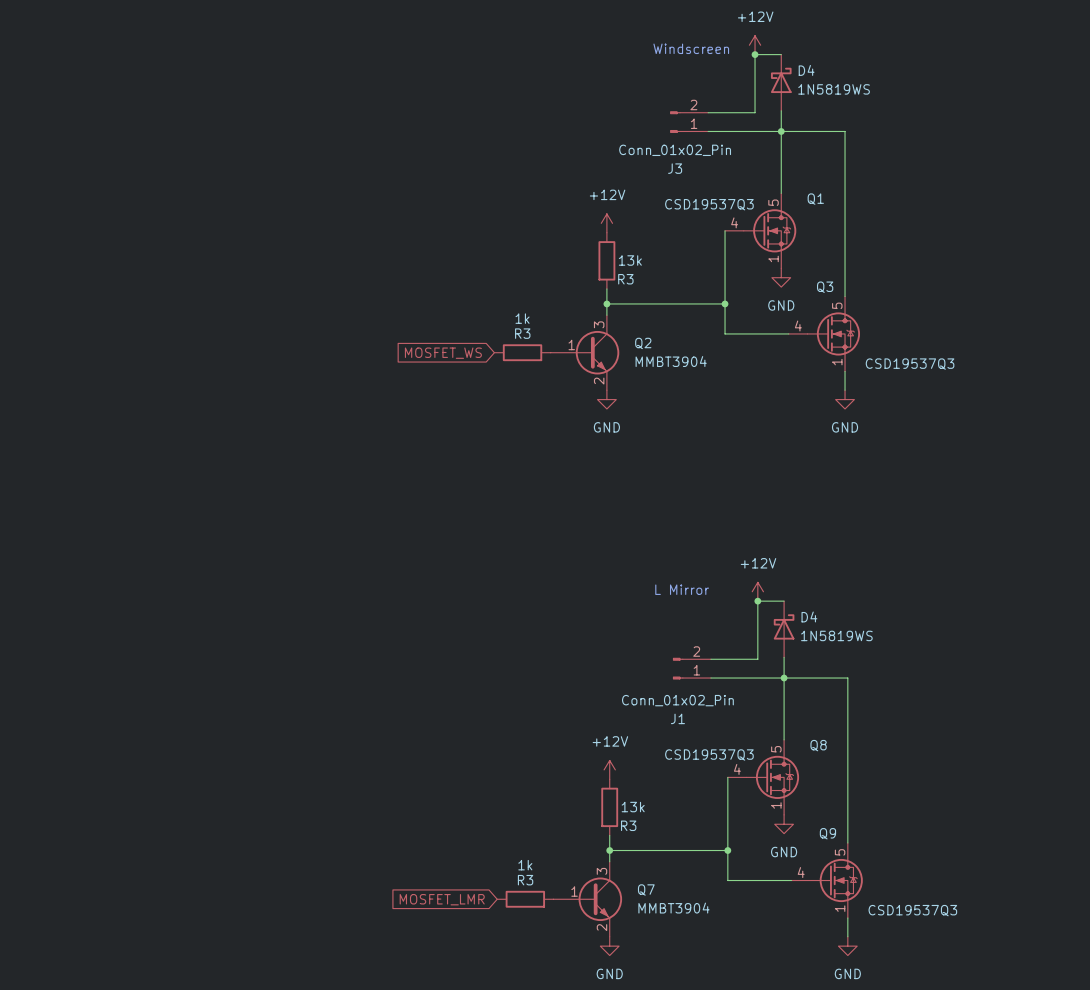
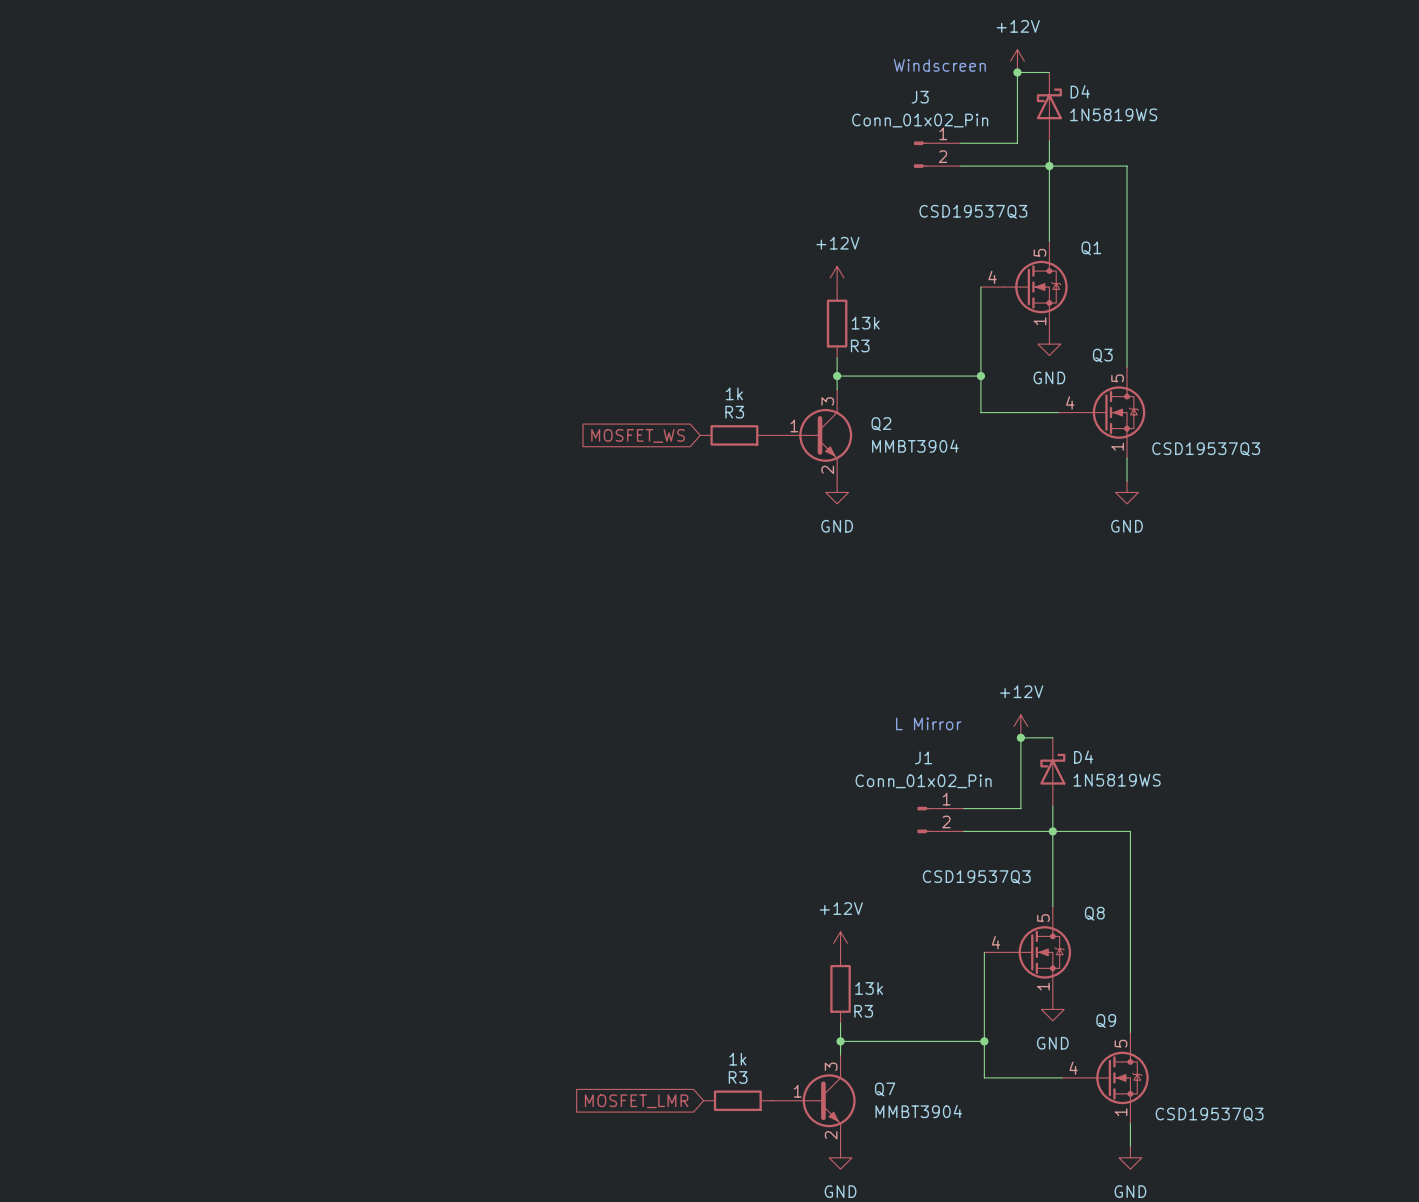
J3 flip: as is (675, 122) -> up-down (920, 154)
Q1 value position: CSD19537Q3 (709, 204) -> CSD19537Q3 (973, 211)
J1 flip: as is (678, 668) -> up-down (923, 820)
Q8 value position: CSD19537Q3 (709, 754) -> CSD19537Q3 (976, 877)

